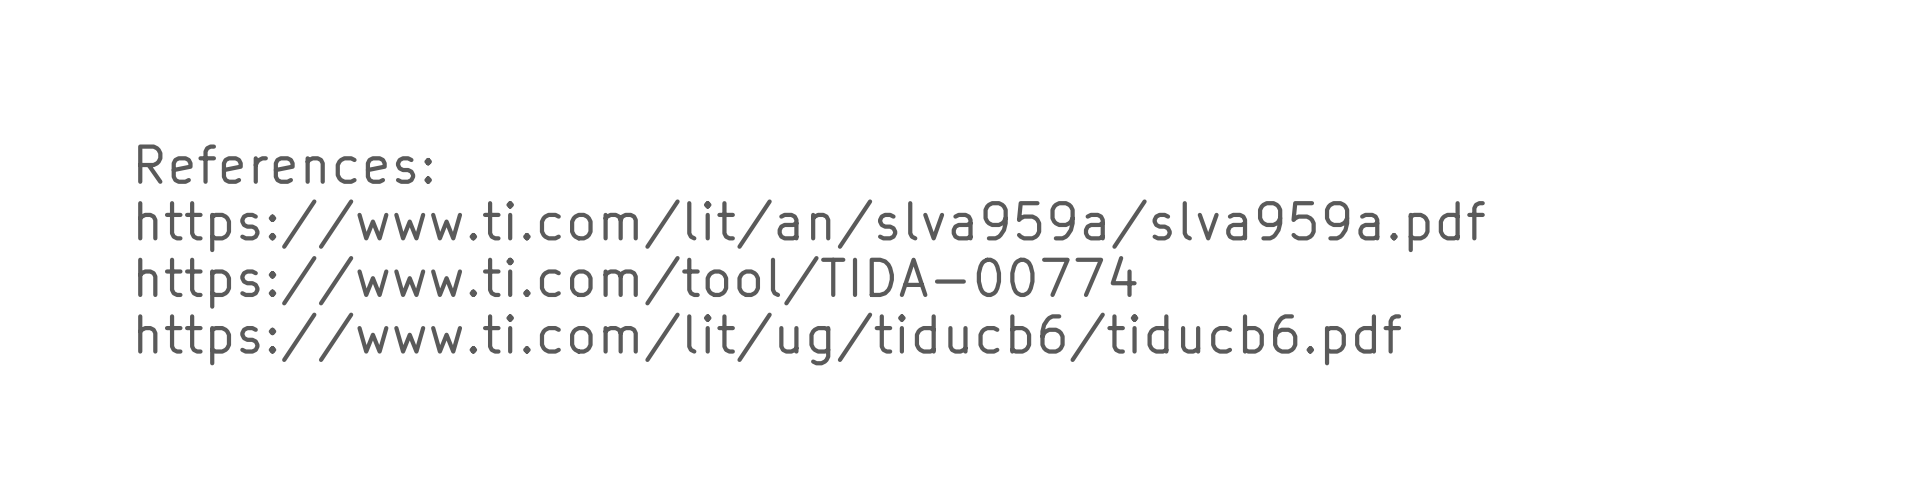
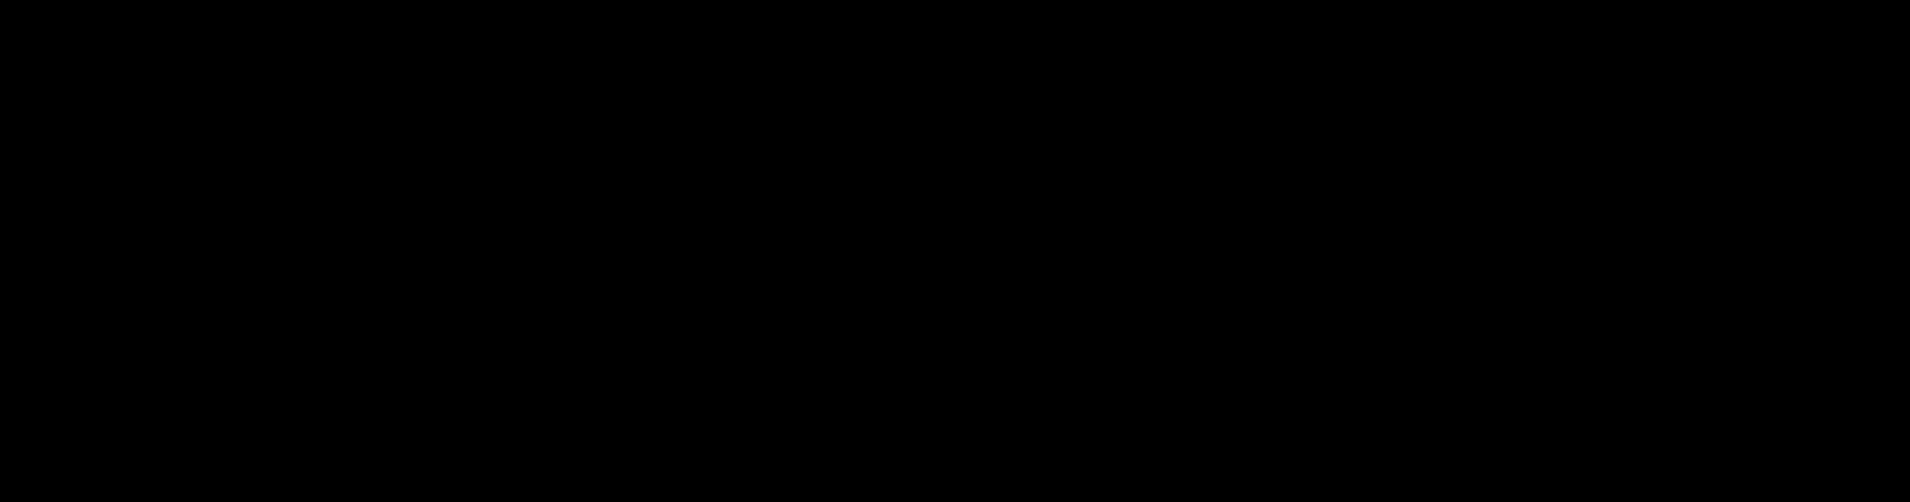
text: References: (285, 164) -> none
text: https://www.ti.com/lit/an/slva959a/slva959a.pdf (811, 225) -> none
text: https://www.ti.com/tool/TIDA-00774 (637, 282) -> none
text: https://www.ti.com/lit/ug/tiducb6/tiducb6.pdf (769, 338) -> none

